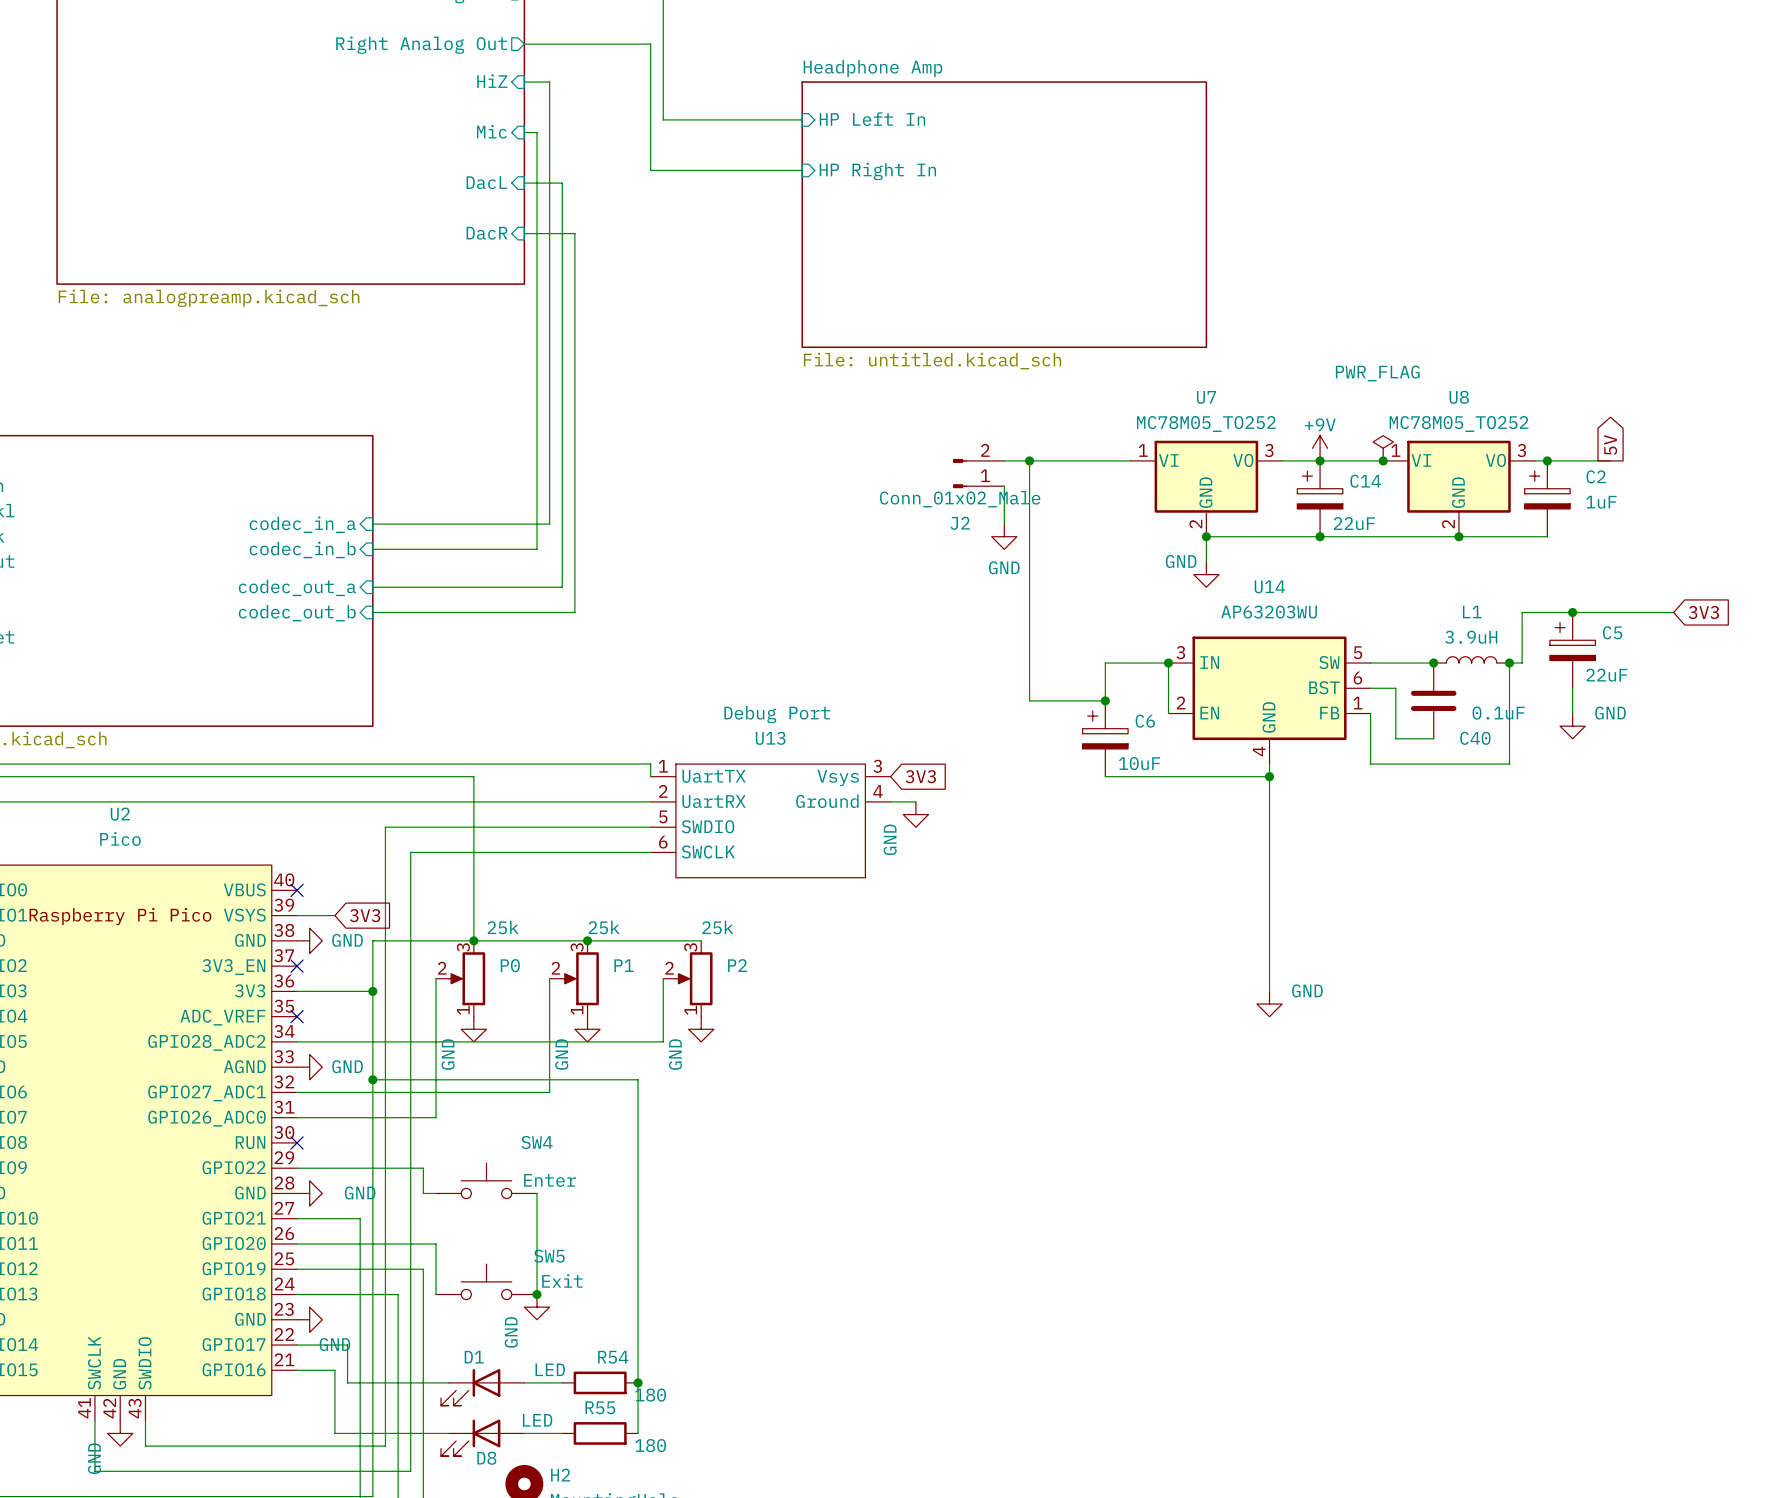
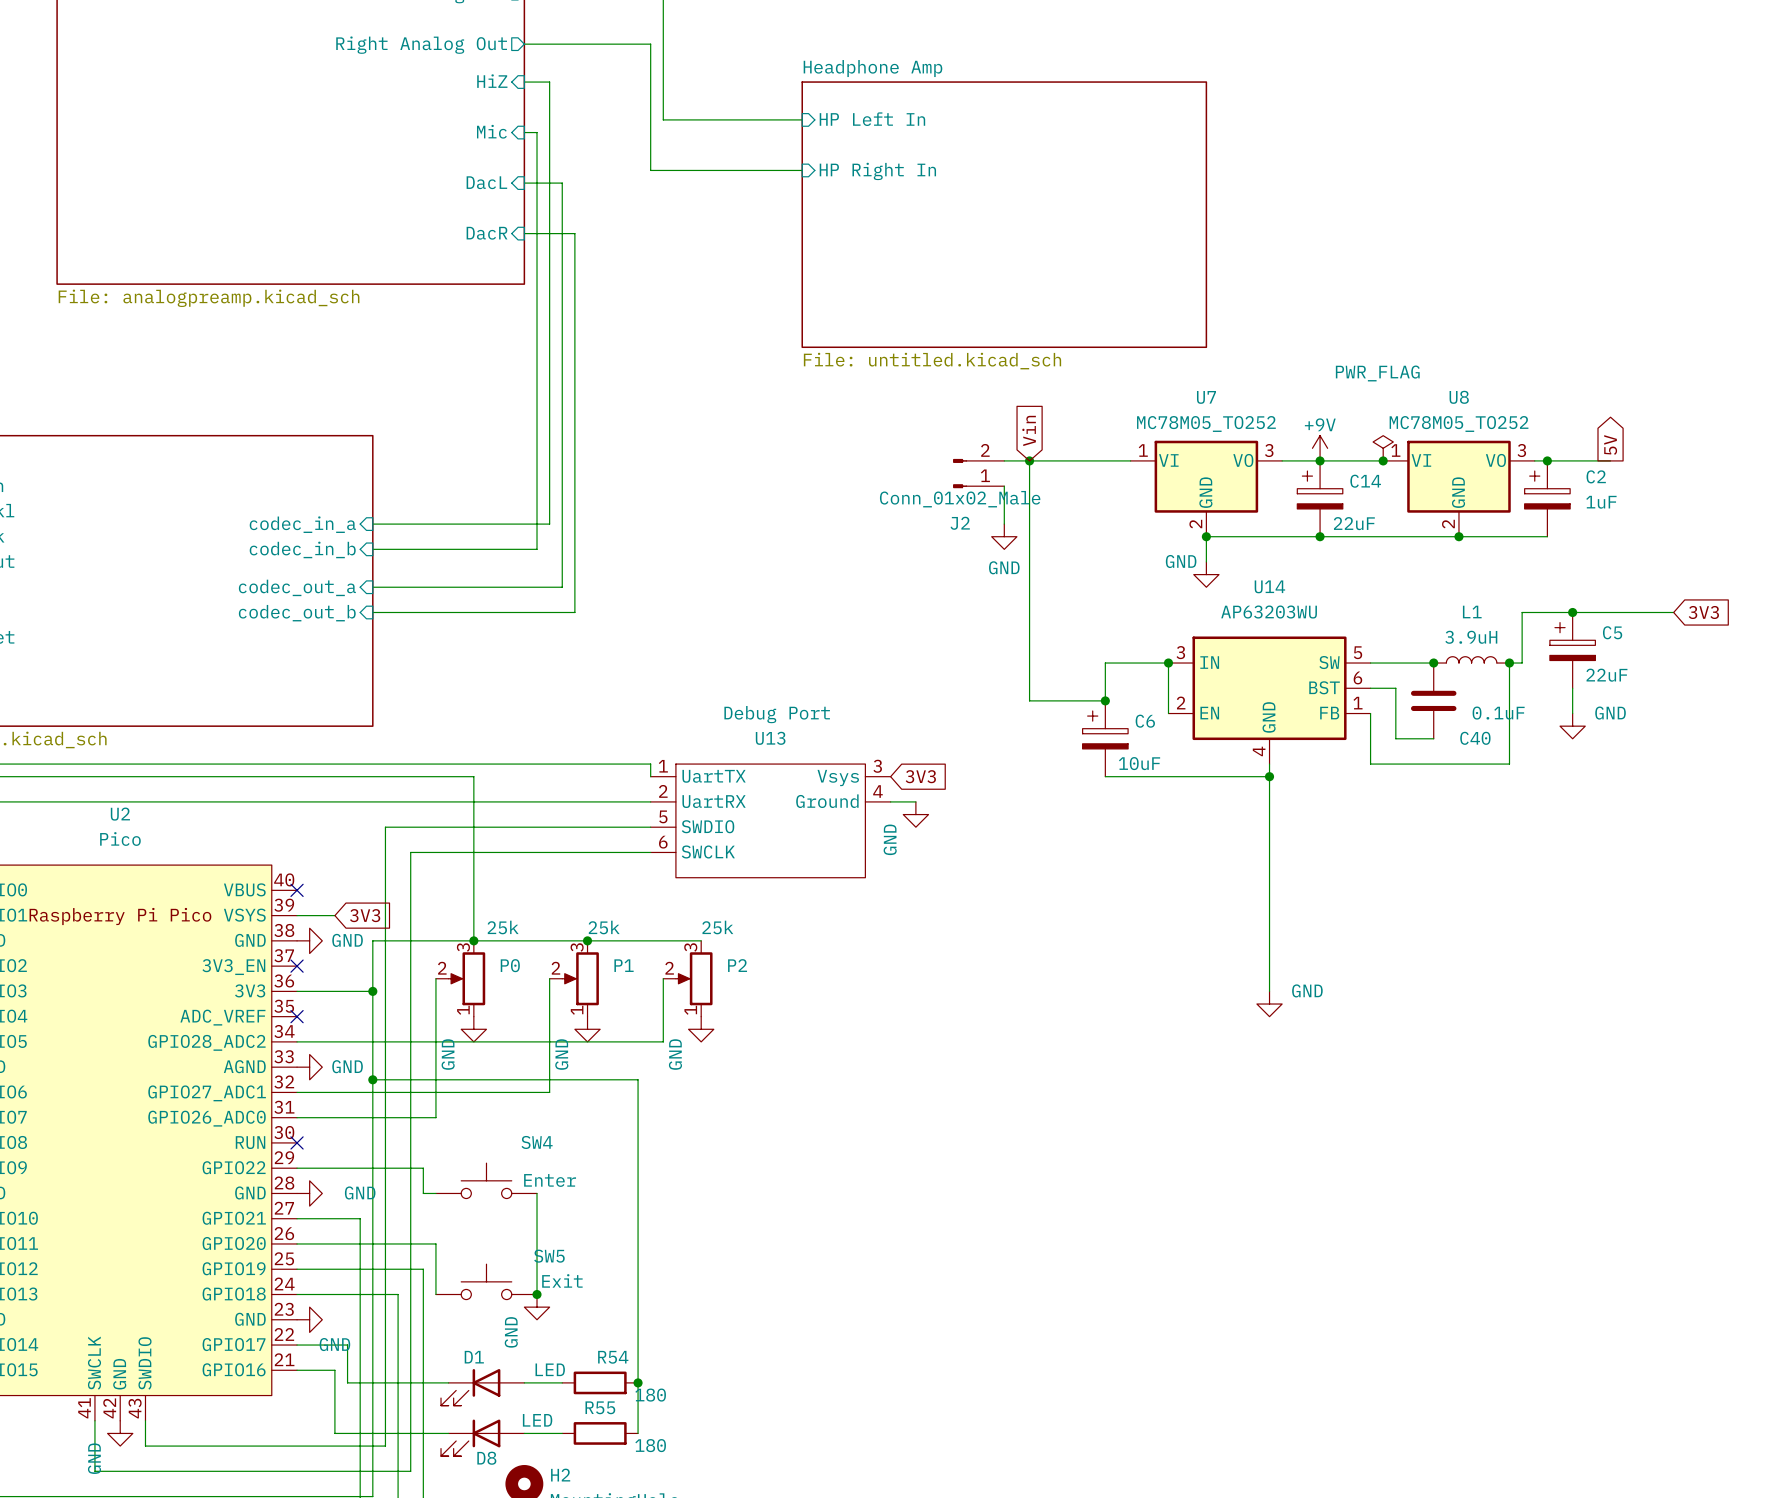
global label: none -> Vin (1029, 430)

